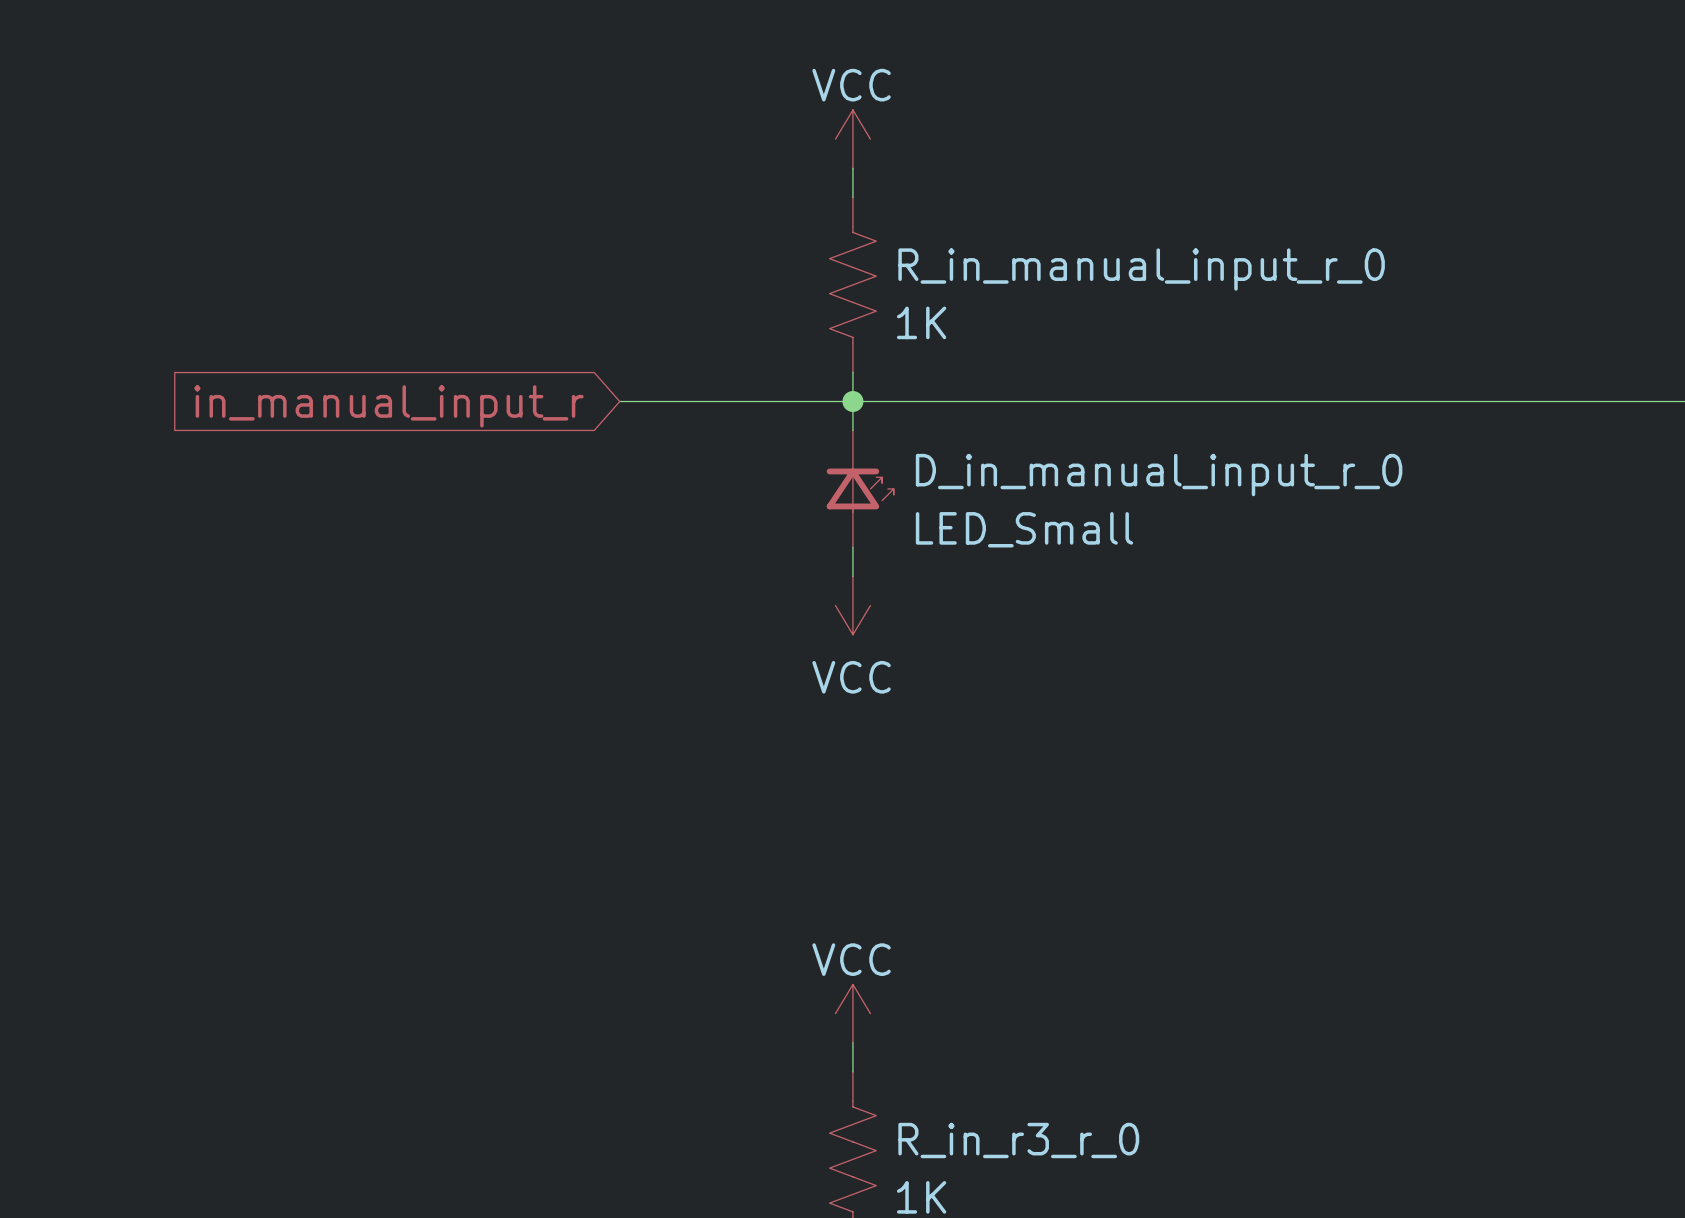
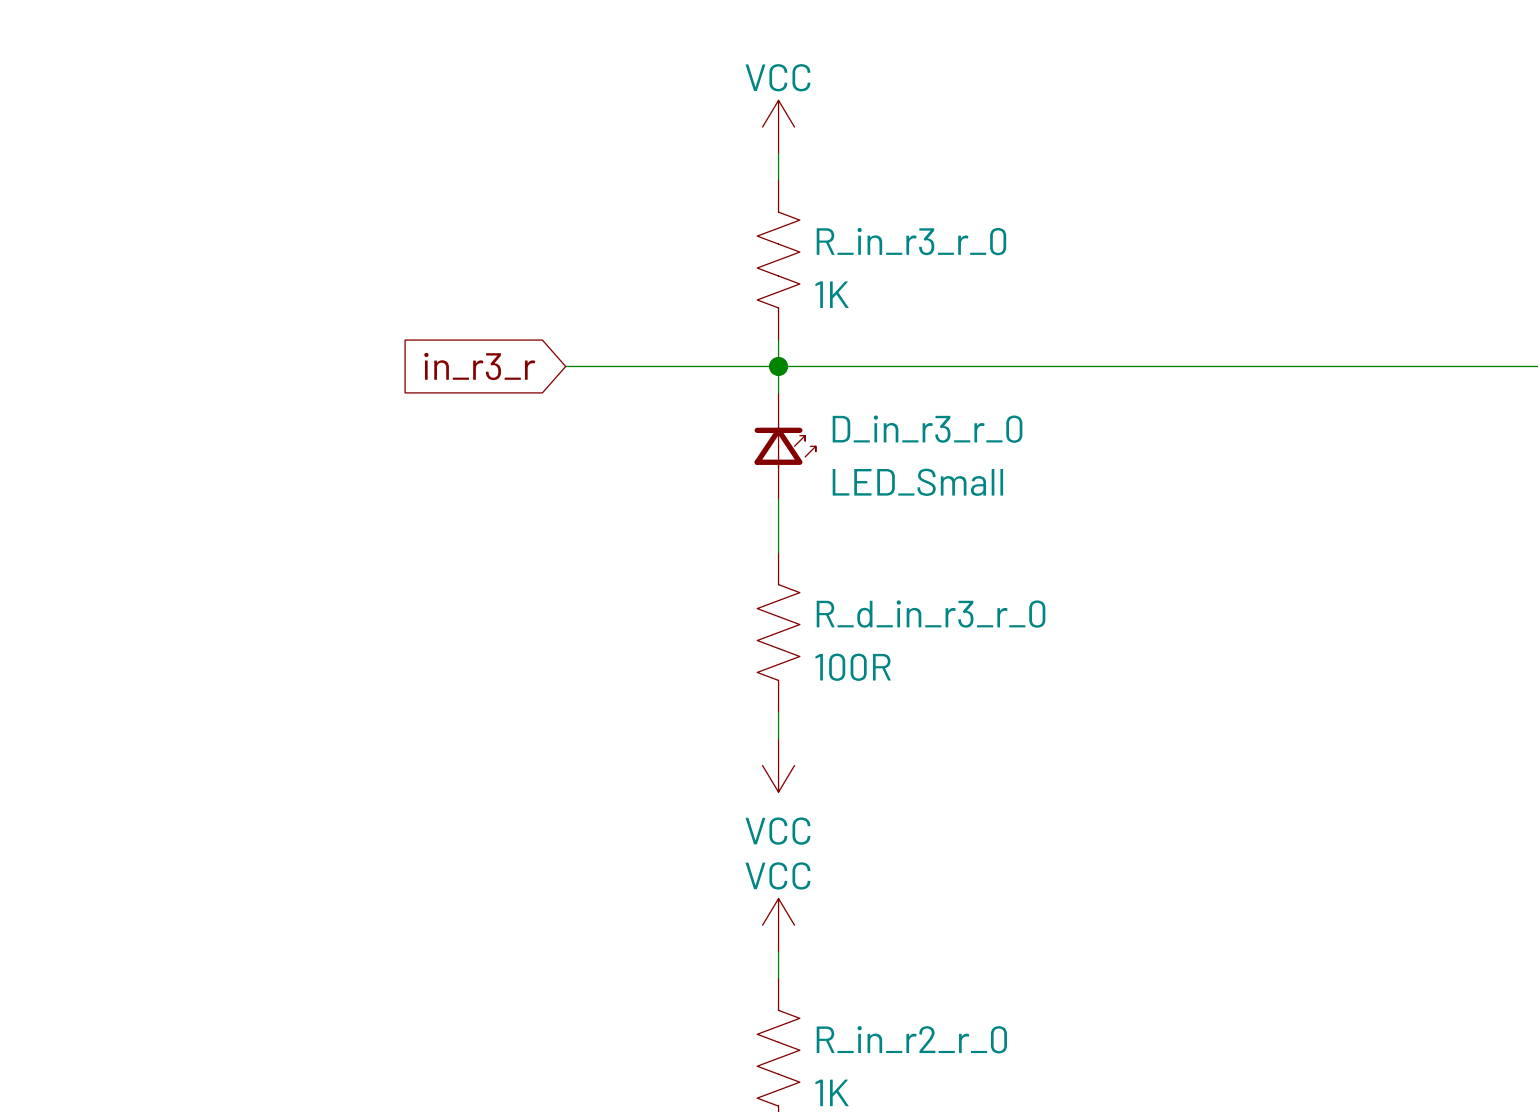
R_in_manual_input_r_0 name: R_in_manual_input_r_0 (1141, 269) -> R_in_r3_r_0 (911, 241)
global label: in_manual_input_r (388, 406) -> in_r3_r (479, 366)
D_in_manual_input_r_0 name: D_in_manual_input_r_0 (1159, 475) -> D_in_r3_r_0 (927, 429)
power symbol position: VCC (852, 605) -> VCC (778, 765)
R_d_in_r3_r_0: none -> 100R (778, 632)
wire: none -> (778, 712) (778, 738)
R_in_r3_r_0 name: R_in_r3_r_0 (1018, 1140) -> R_in_r2_r_0 (911, 1039)

